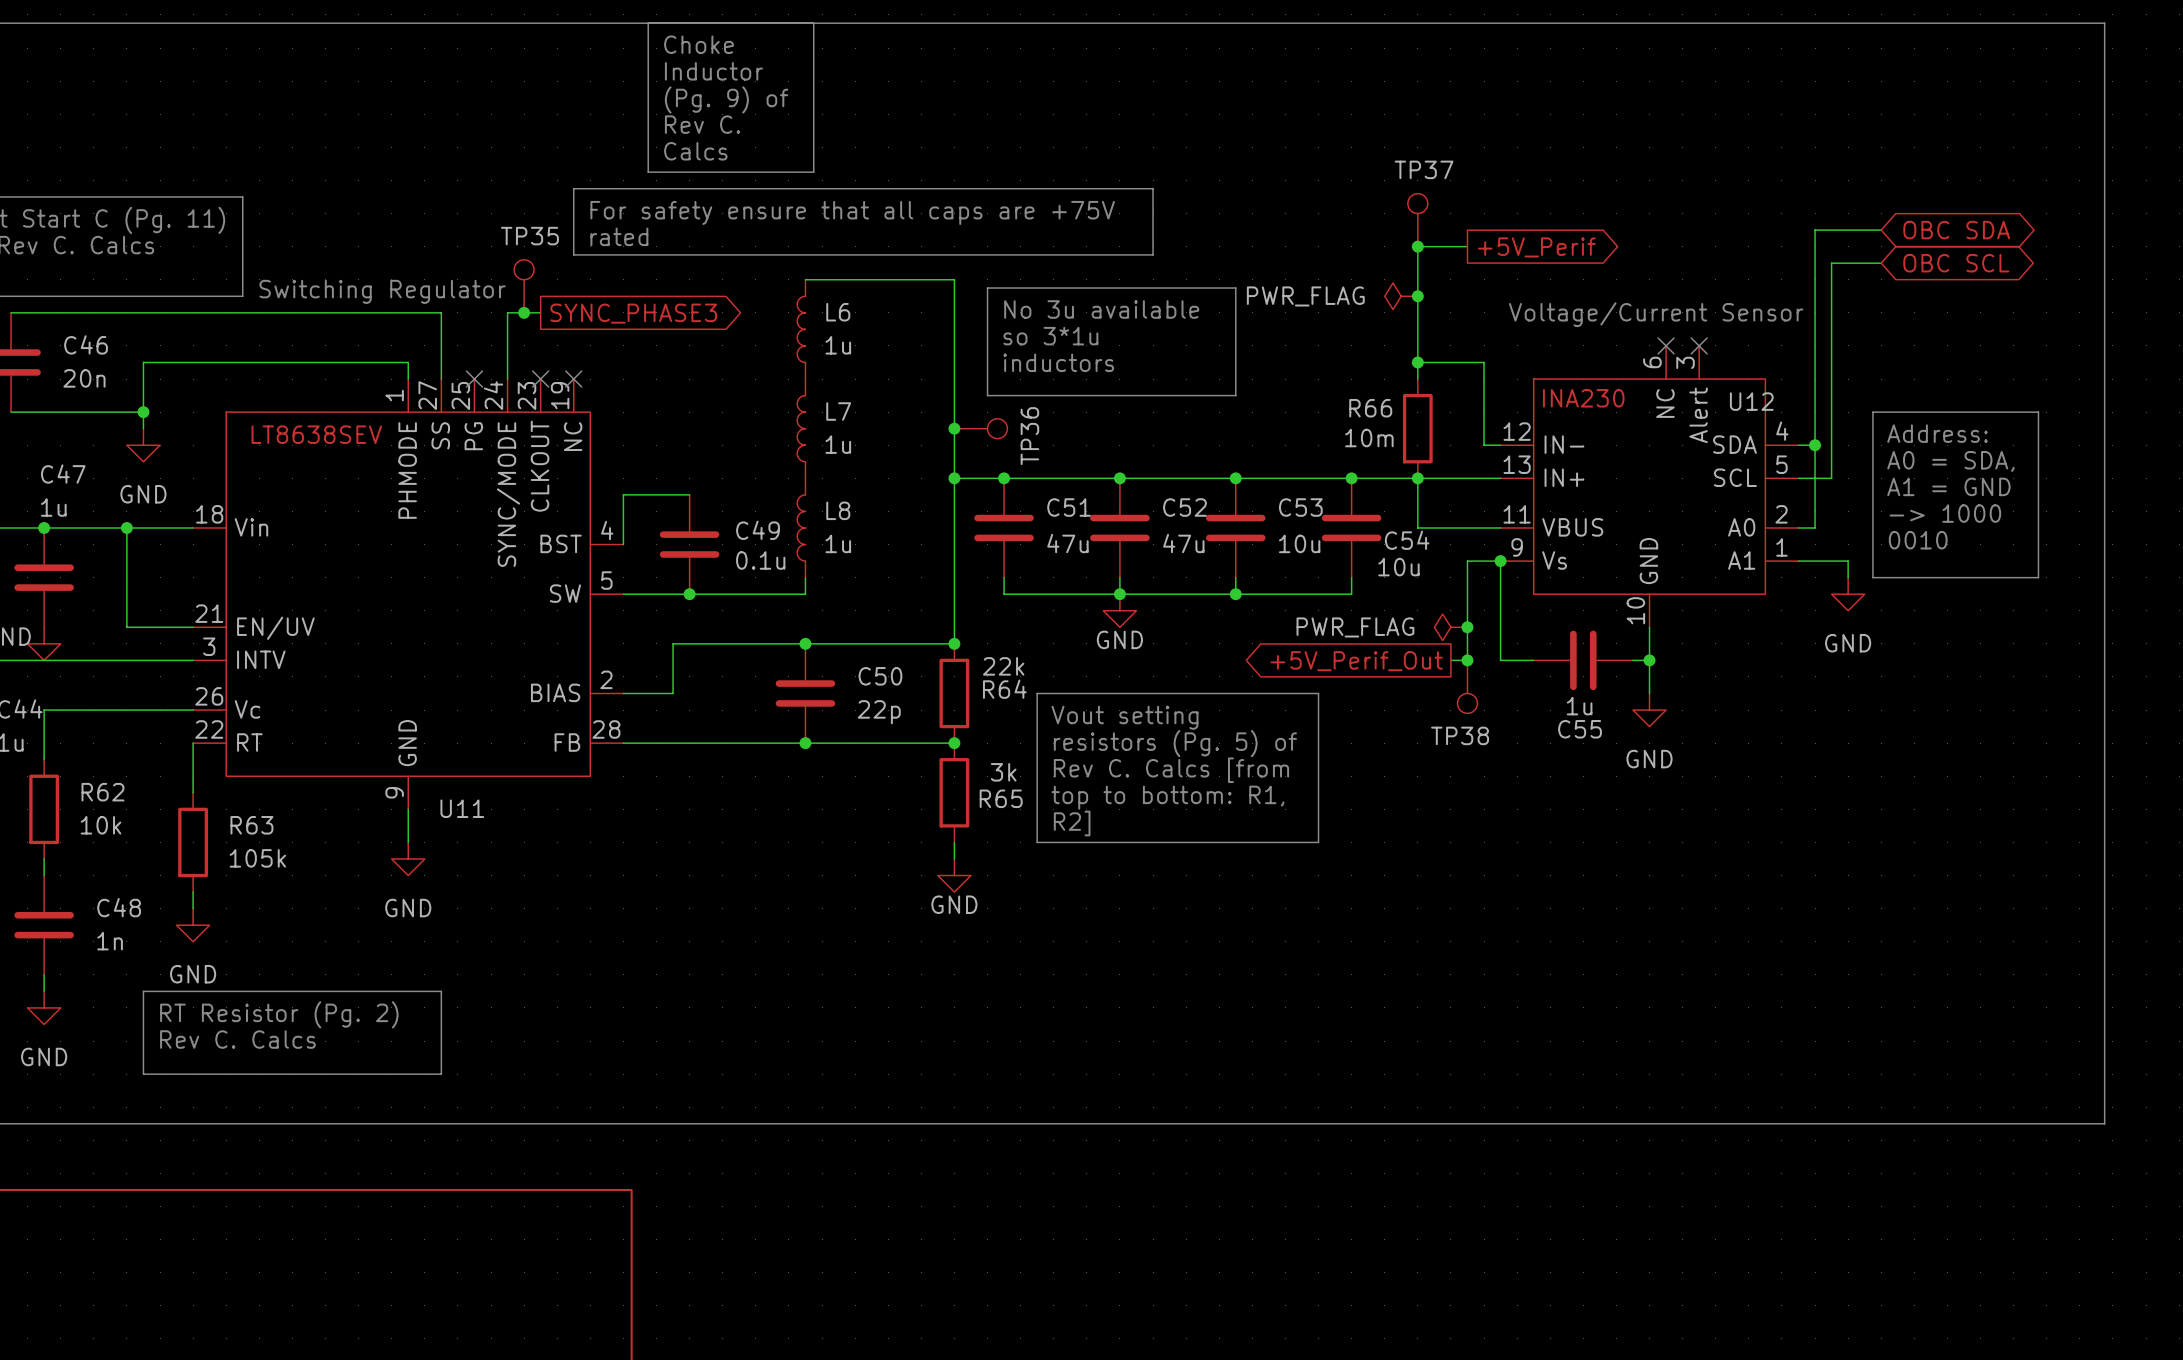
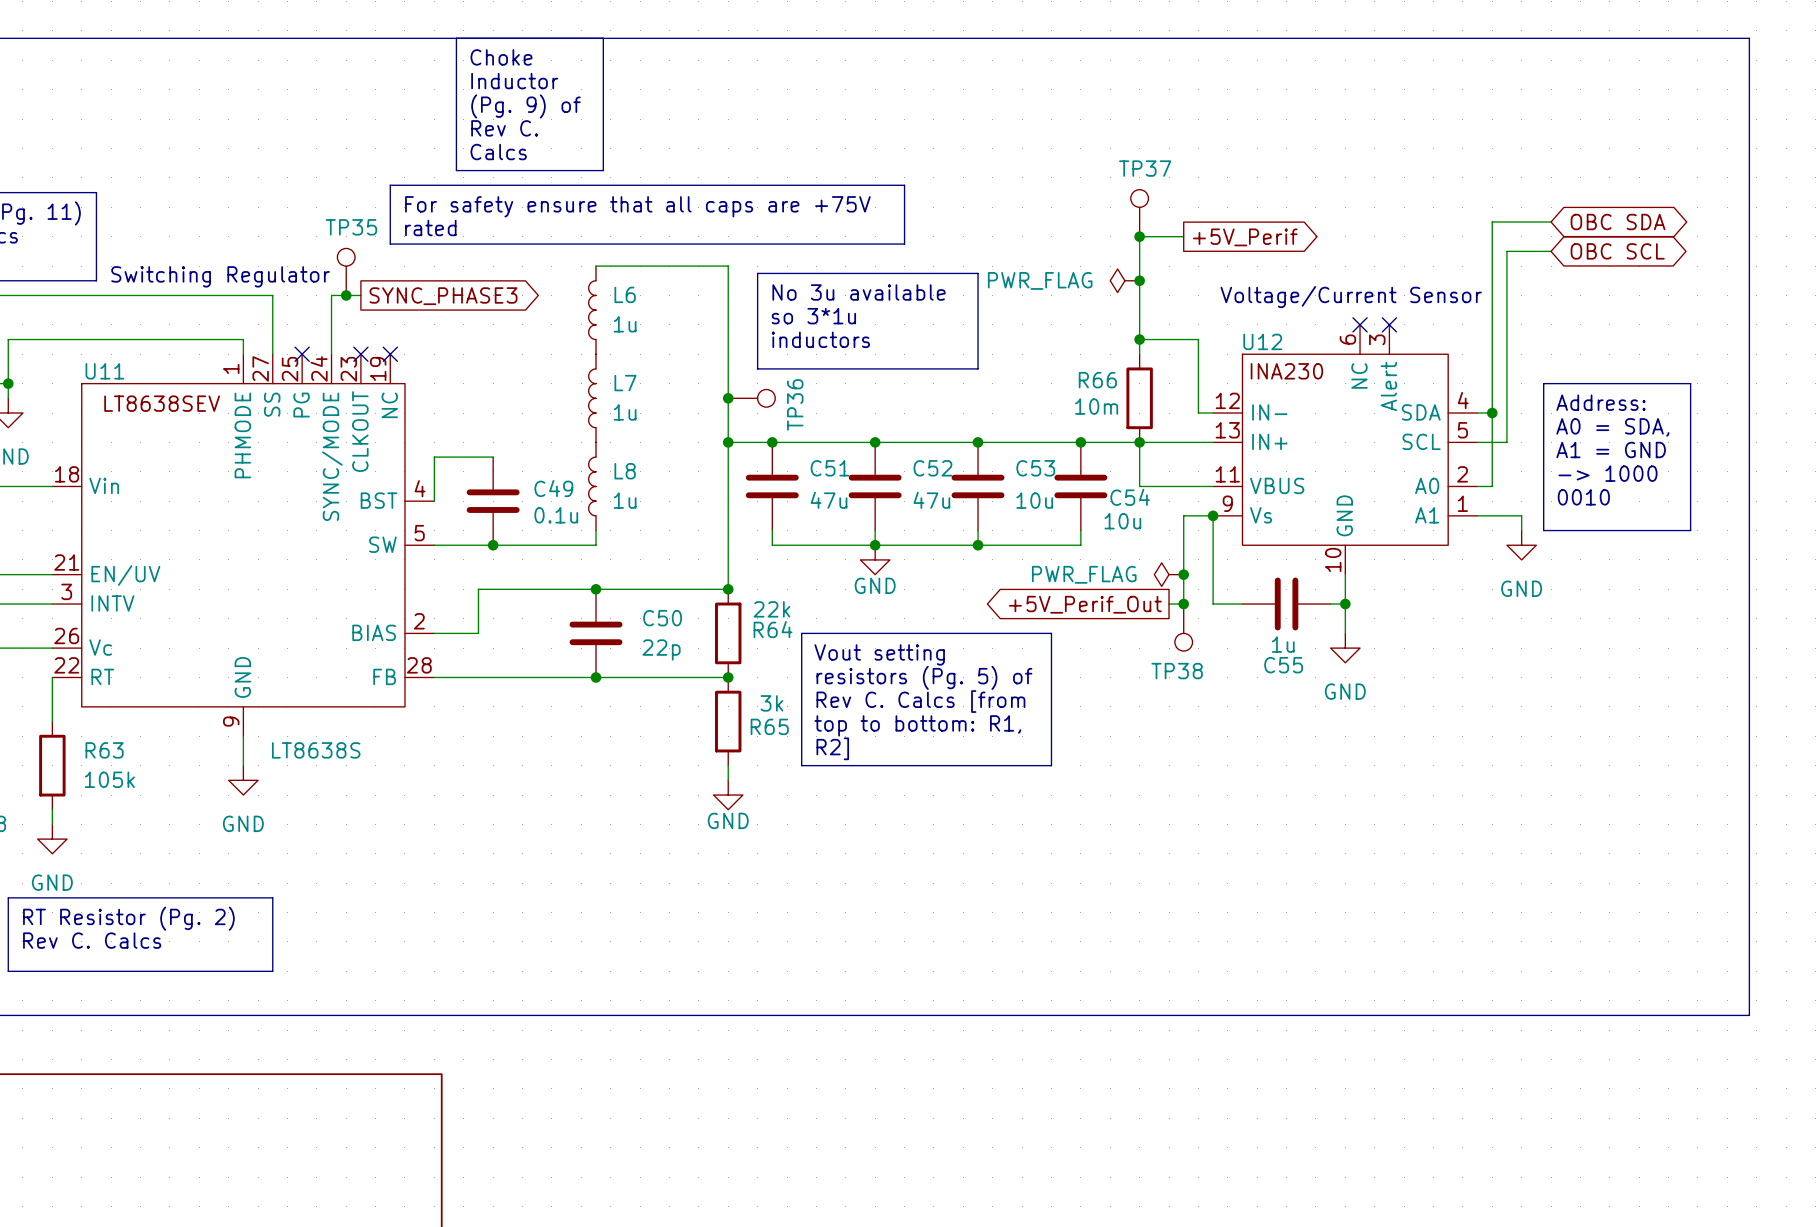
U12 name position: U12 (1751, 401) -> U12 (1262, 341)
U11 name position: U11 (462, 808) -> U11 (104, 371)
U11 value: none -> LT8638S (316, 750)

